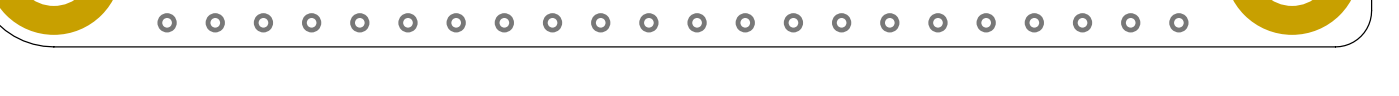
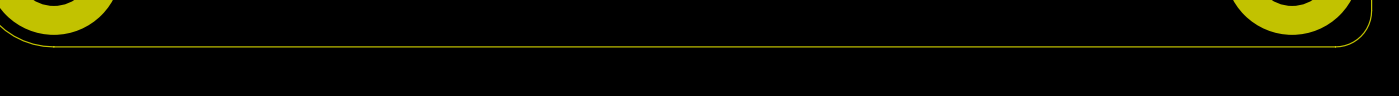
via: (167, 22) -> none
via: (215, 22) -> none
via: (263, 22) -> none
via: (311, 22) -> none
via: (359, 22) -> none
via: (407, 22) -> none
via: (456, 22) -> none
via: (504, 22) -> none
via: (552, 22) -> none
via: (600, 22) -> none
via: (648, 22) -> none
via: (697, 22) -> none
via: (745, 22) -> none
via: (793, 22) -> none
via: (841, 22) -> none
via: (889, 22) -> none
via: (937, 22) -> none
via: (986, 22) -> none
via: (1034, 22) -> none
via: (1082, 22) -> none
via: (1130, 22) -> none
via: (1178, 22) -> none

